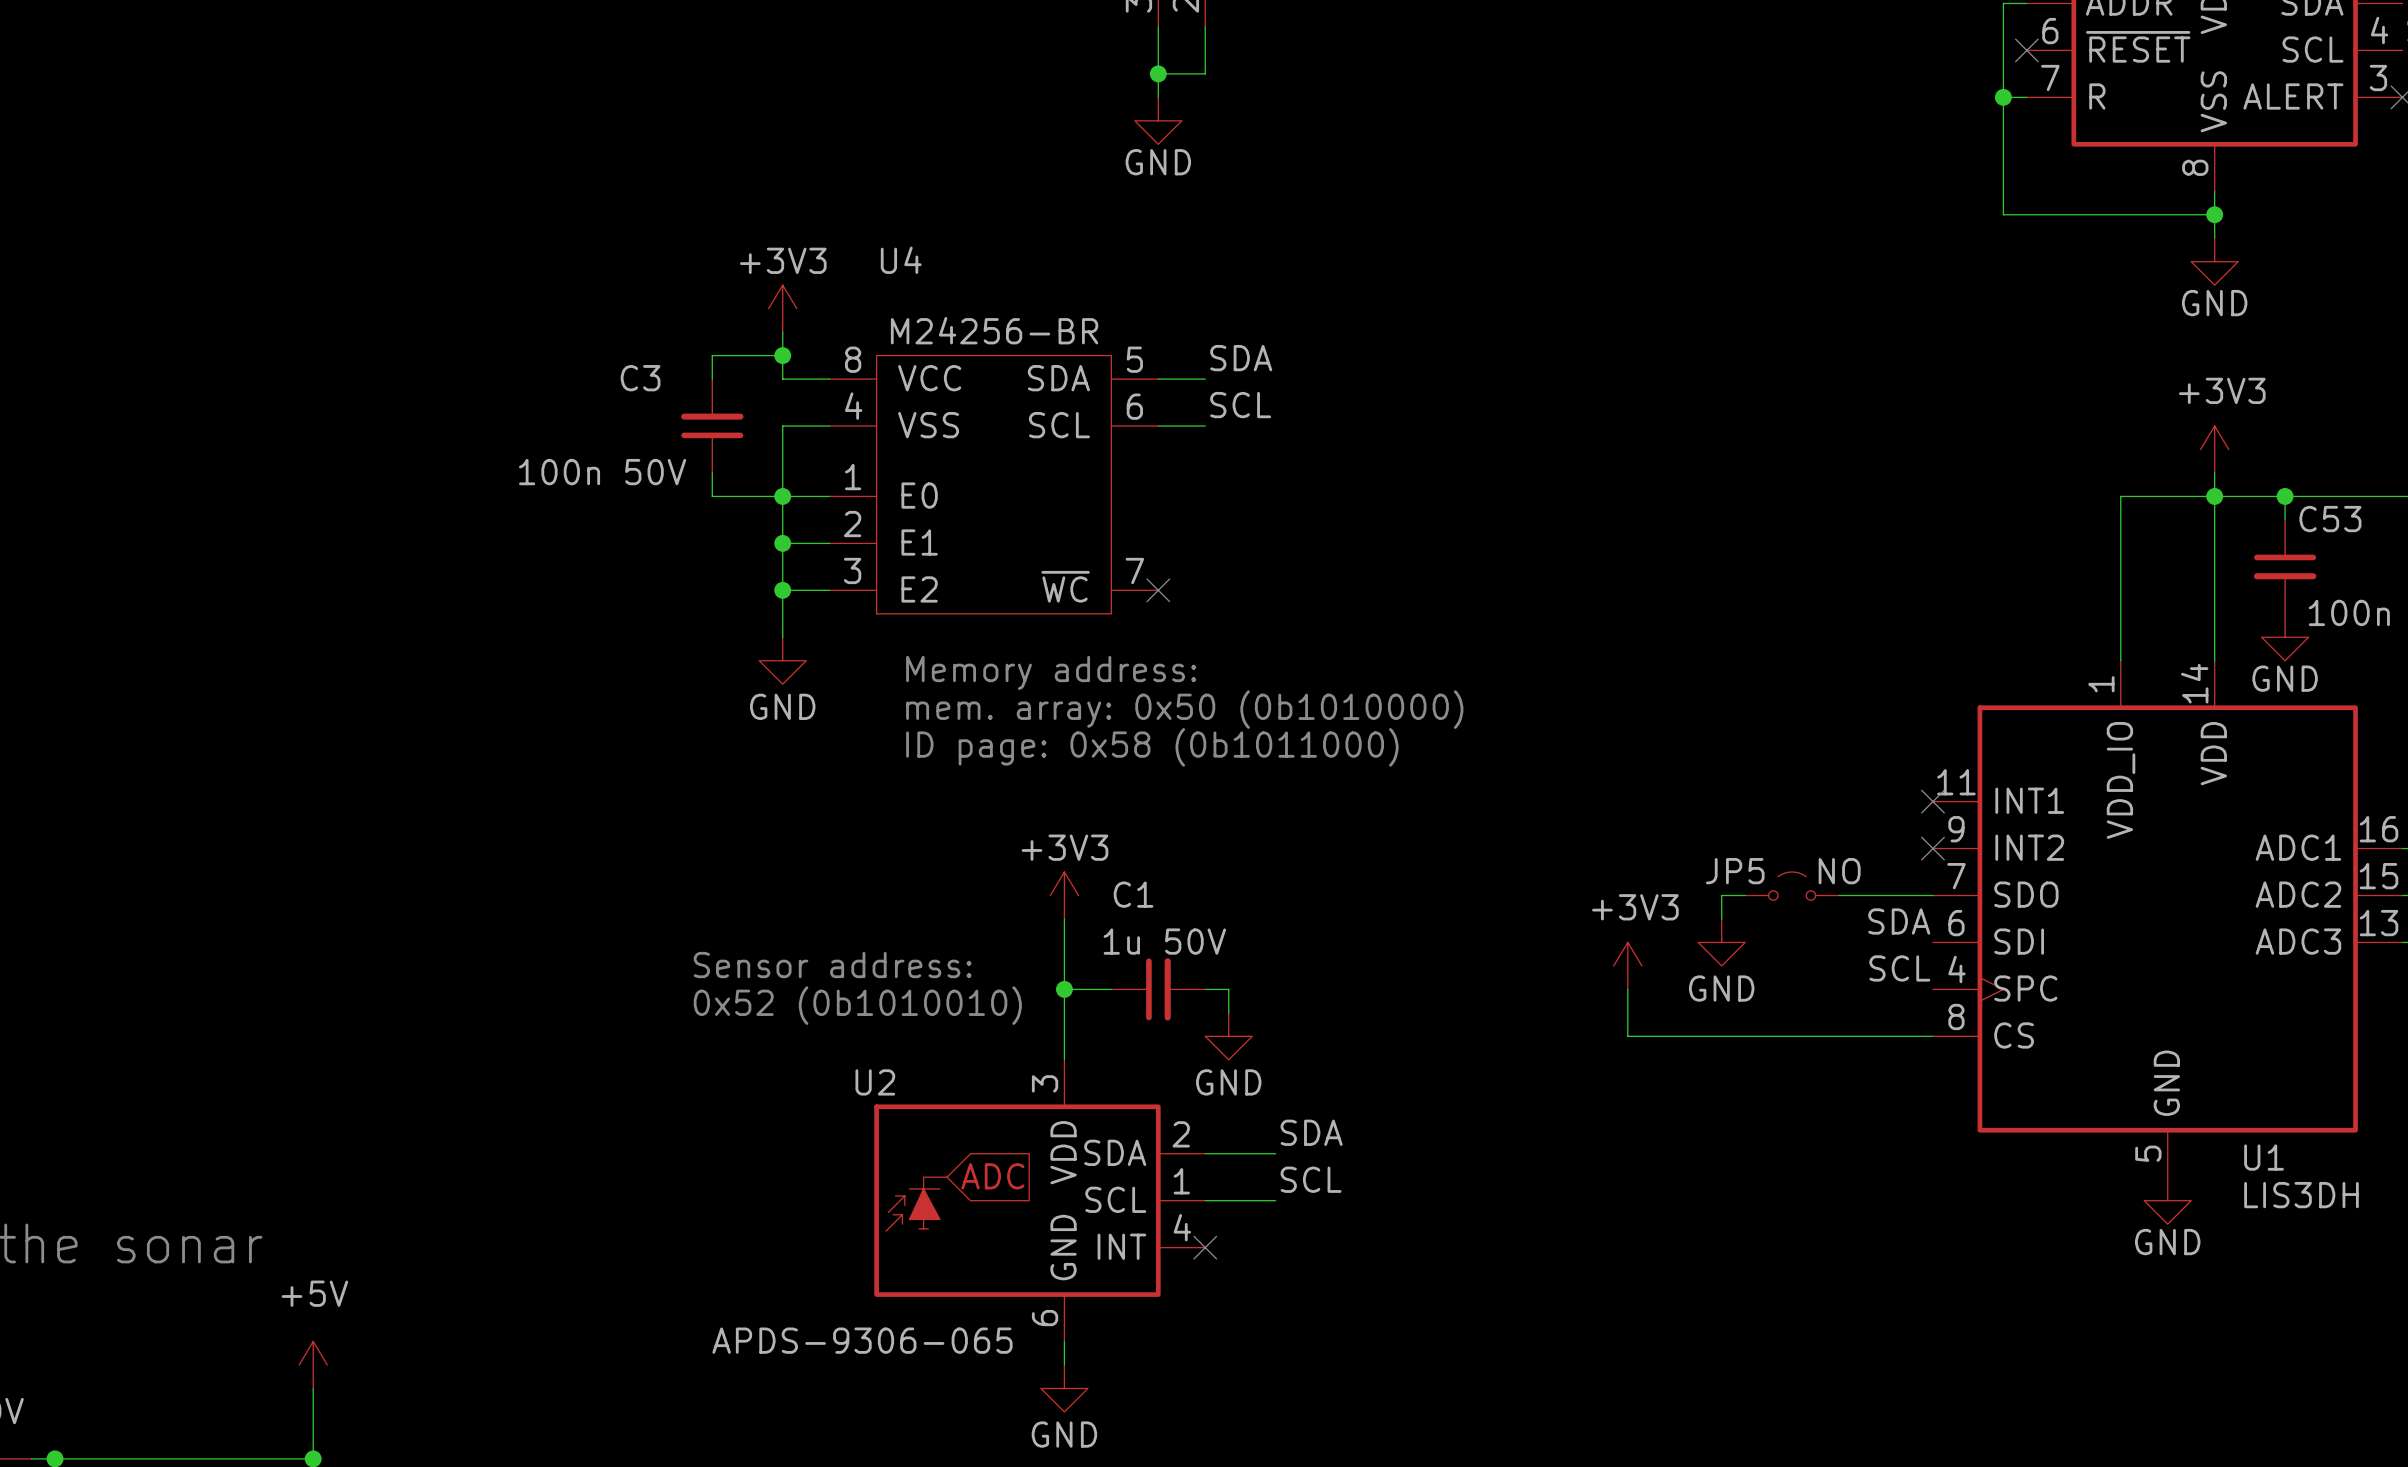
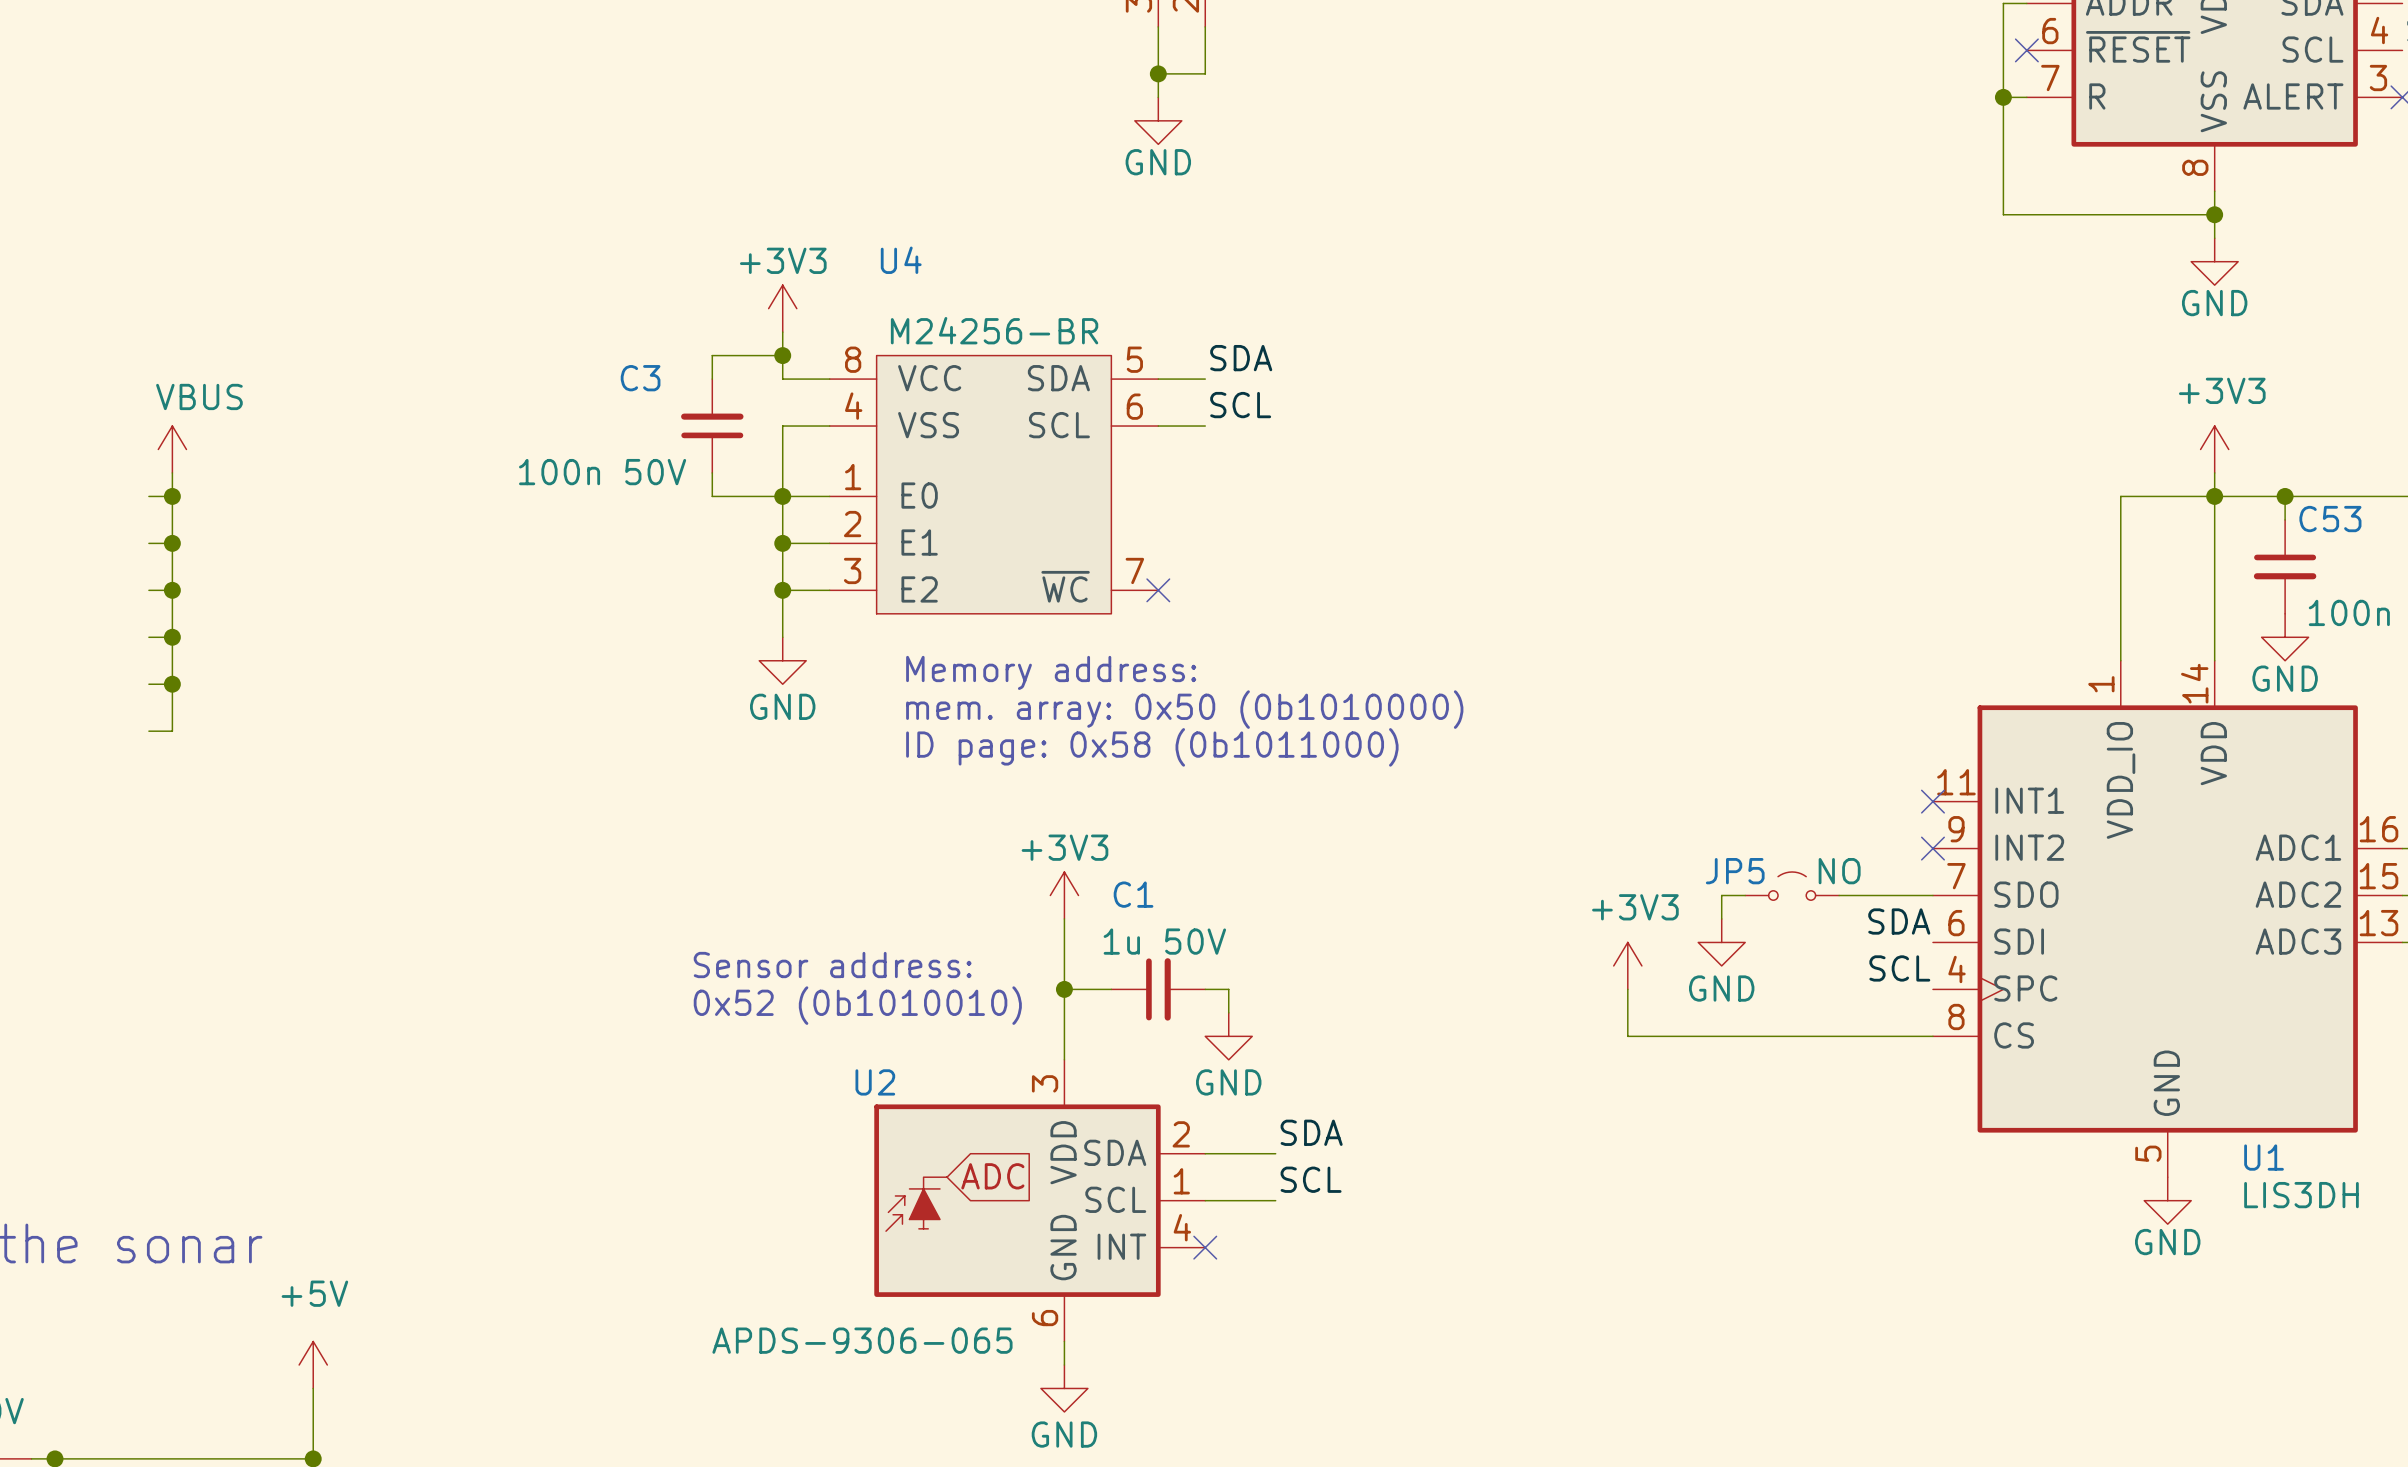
power symbol: none -> VBUS (172, 449)
wire: none -> (172, 472) (172, 731) (148, 731)
wire: none -> (148, 496) (172, 496)
junction: none -> (172, 496)
wire: none -> (148, 543) (172, 543)
junction: none -> (172, 543)
wire: none -> (148, 590) (172, 590)
junction: none -> (172, 590)
wire: none -> (148, 637) (172, 637)
junction: none -> (172, 637)
wire: none -> (148, 684) (172, 684)
junction: none -> (172, 684)

